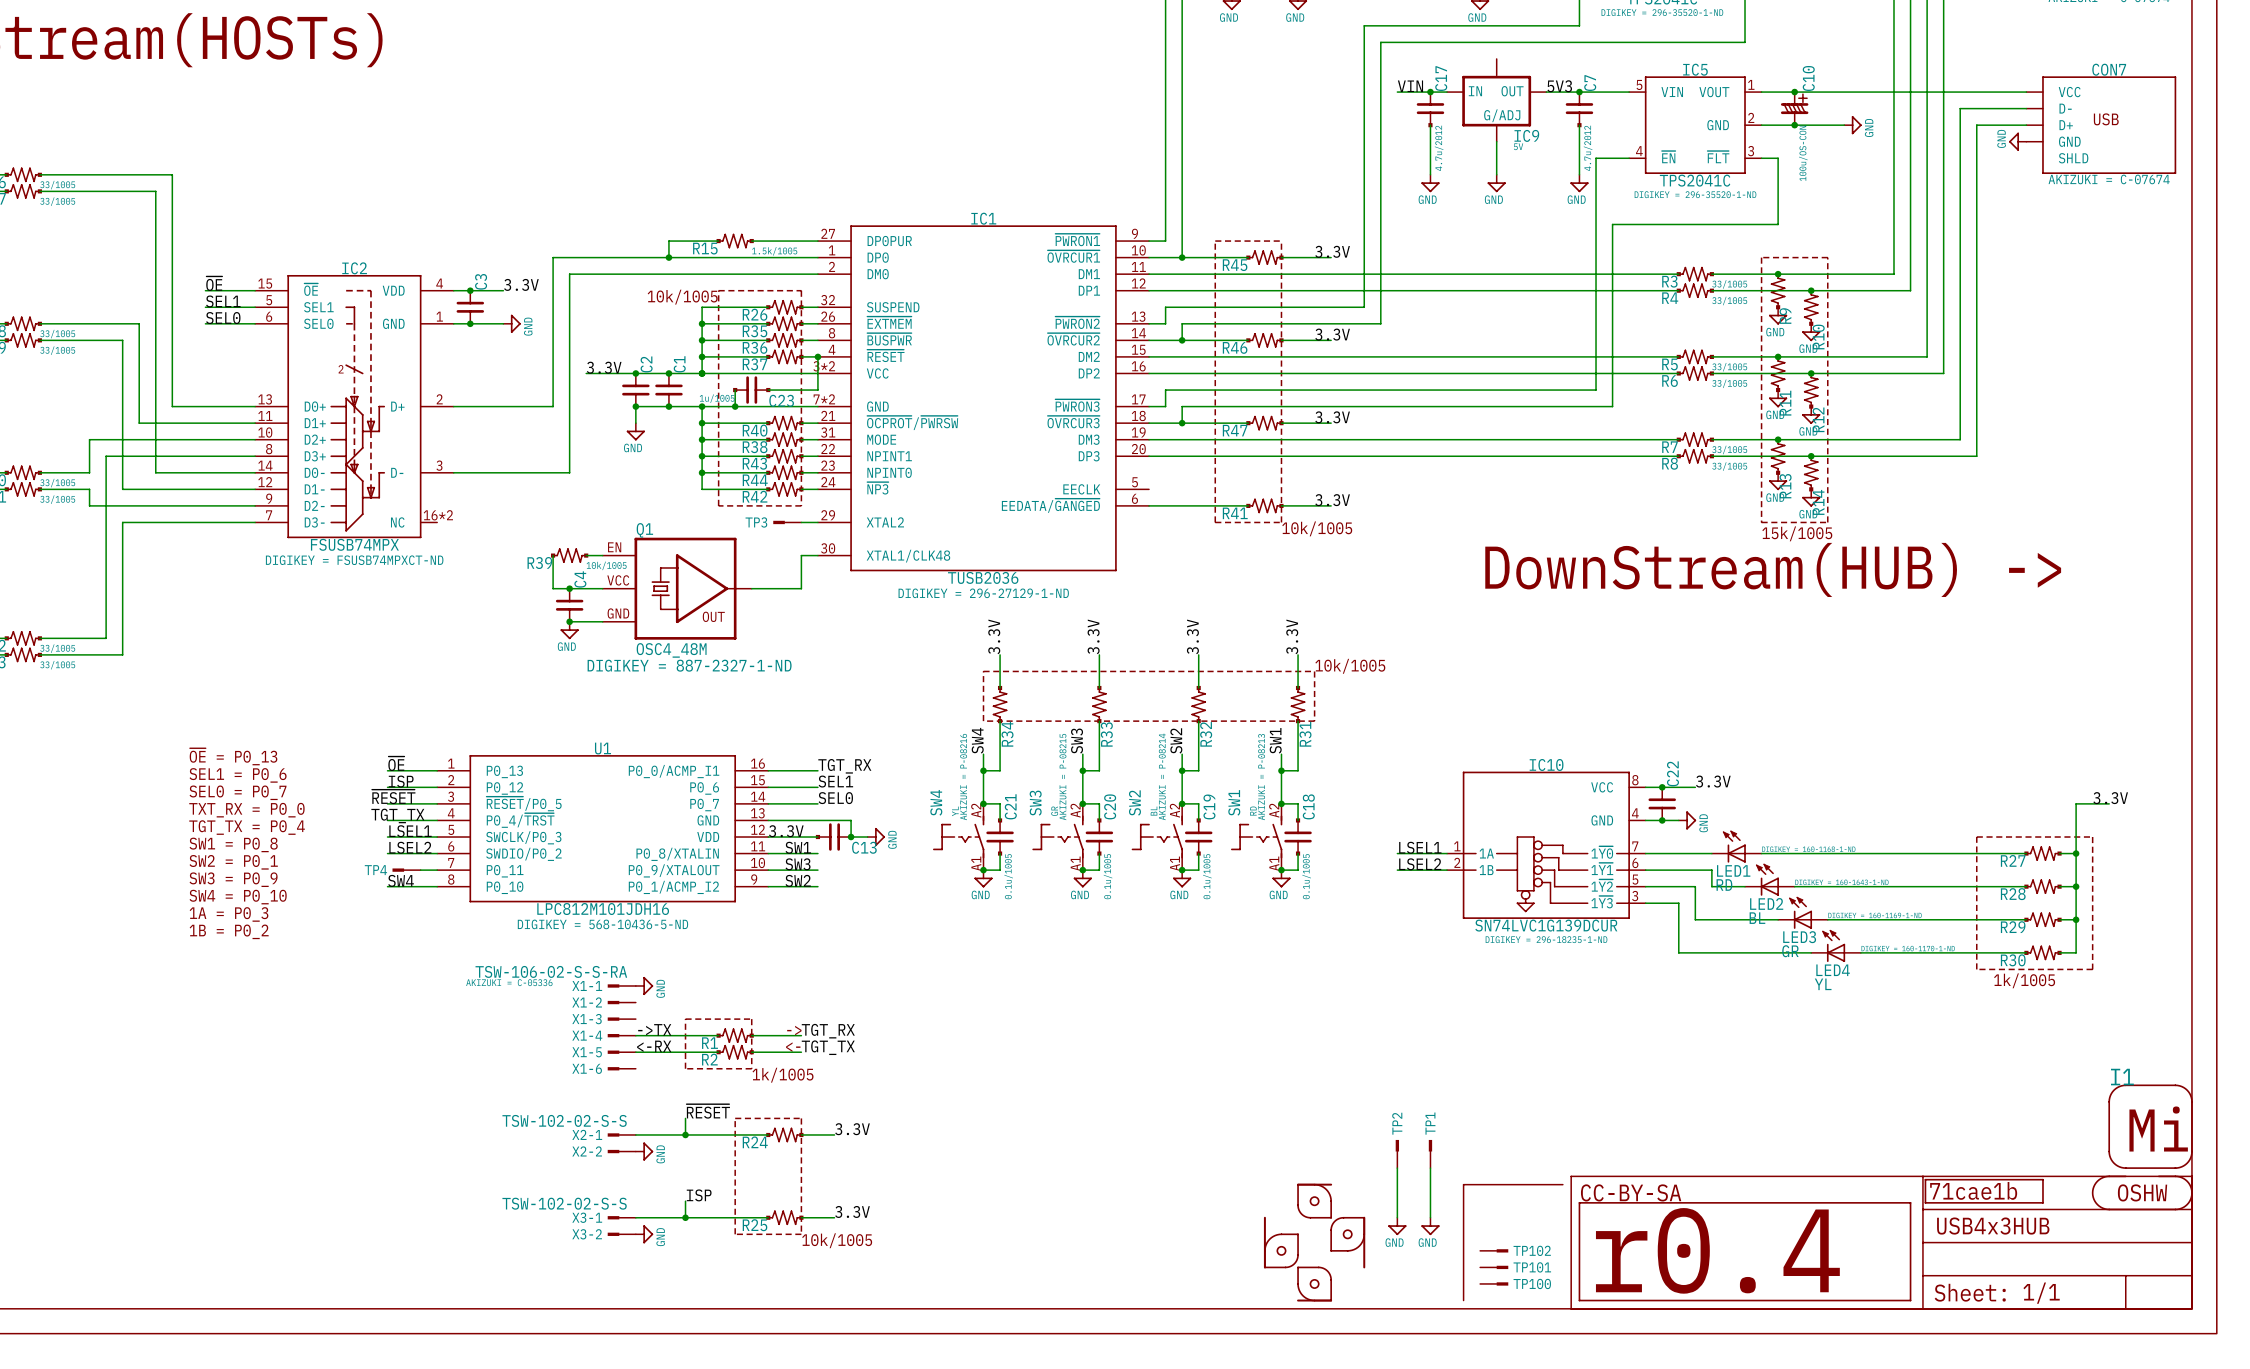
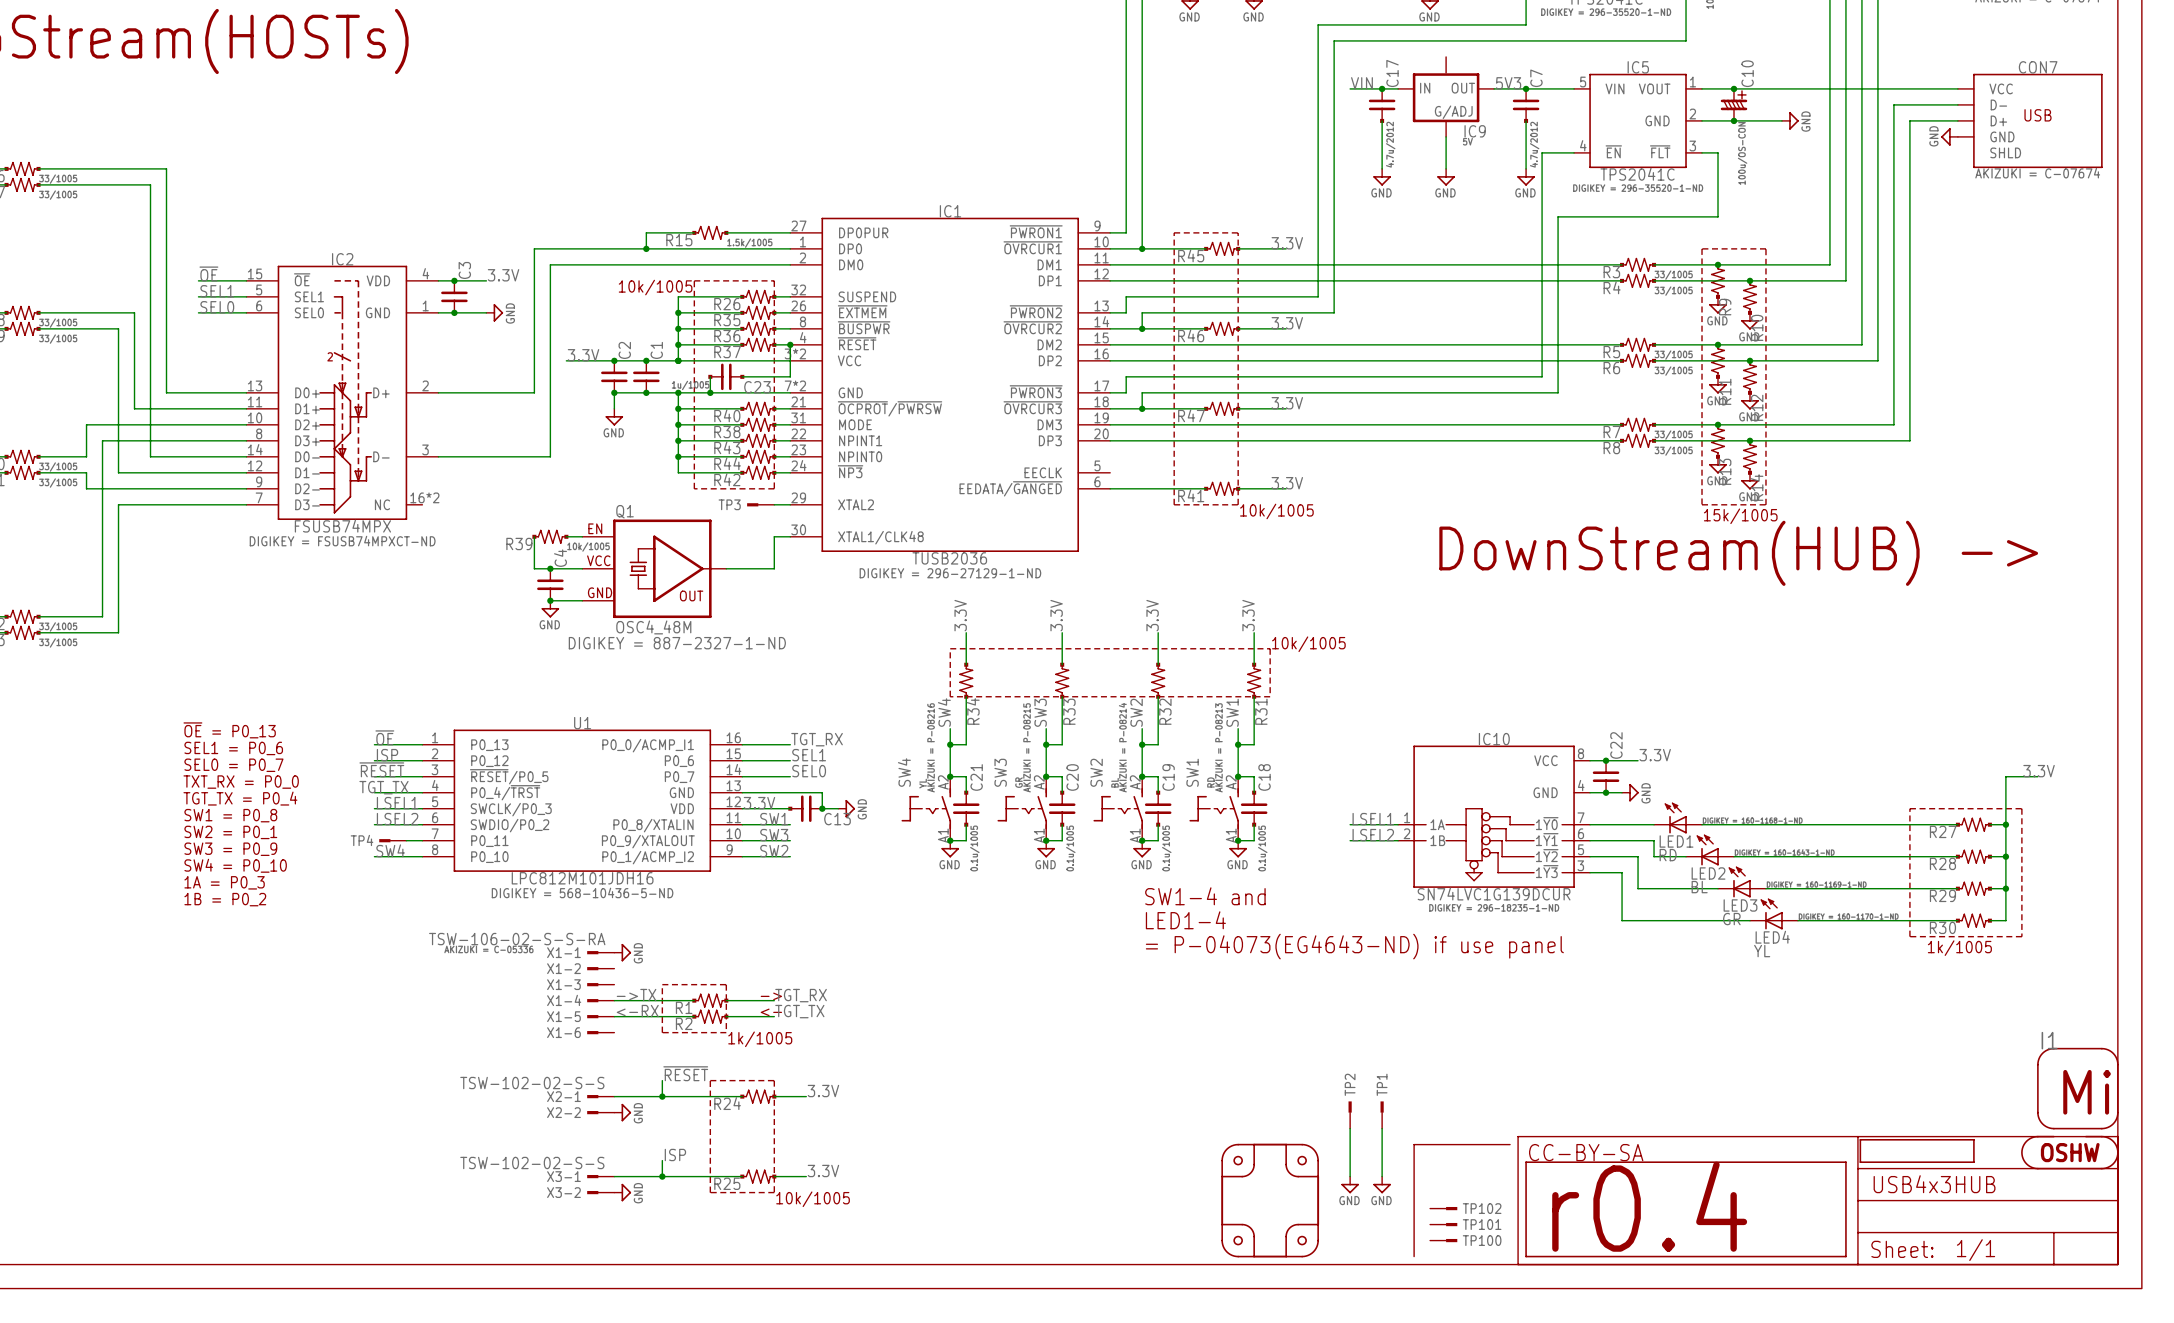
text: none -> SW1-4 and (1205, 896)
text: none -> LED1-4 (1185, 920)
text: none -> = P-04073(EG4643-ND) if use panel (1354, 946)
part value: 71cae1b (1973, 1190) -> none
part: none -> (1238, 1160)
part: (1314, 1201) -> none
part: none -> (1302, 1160)
part: (1347, 1234) -> none
part: (1281, 1250) -> none
part: none -> (1238, 1240)
part: (1314, 1283) -> none
part: none -> (1302, 1240)

